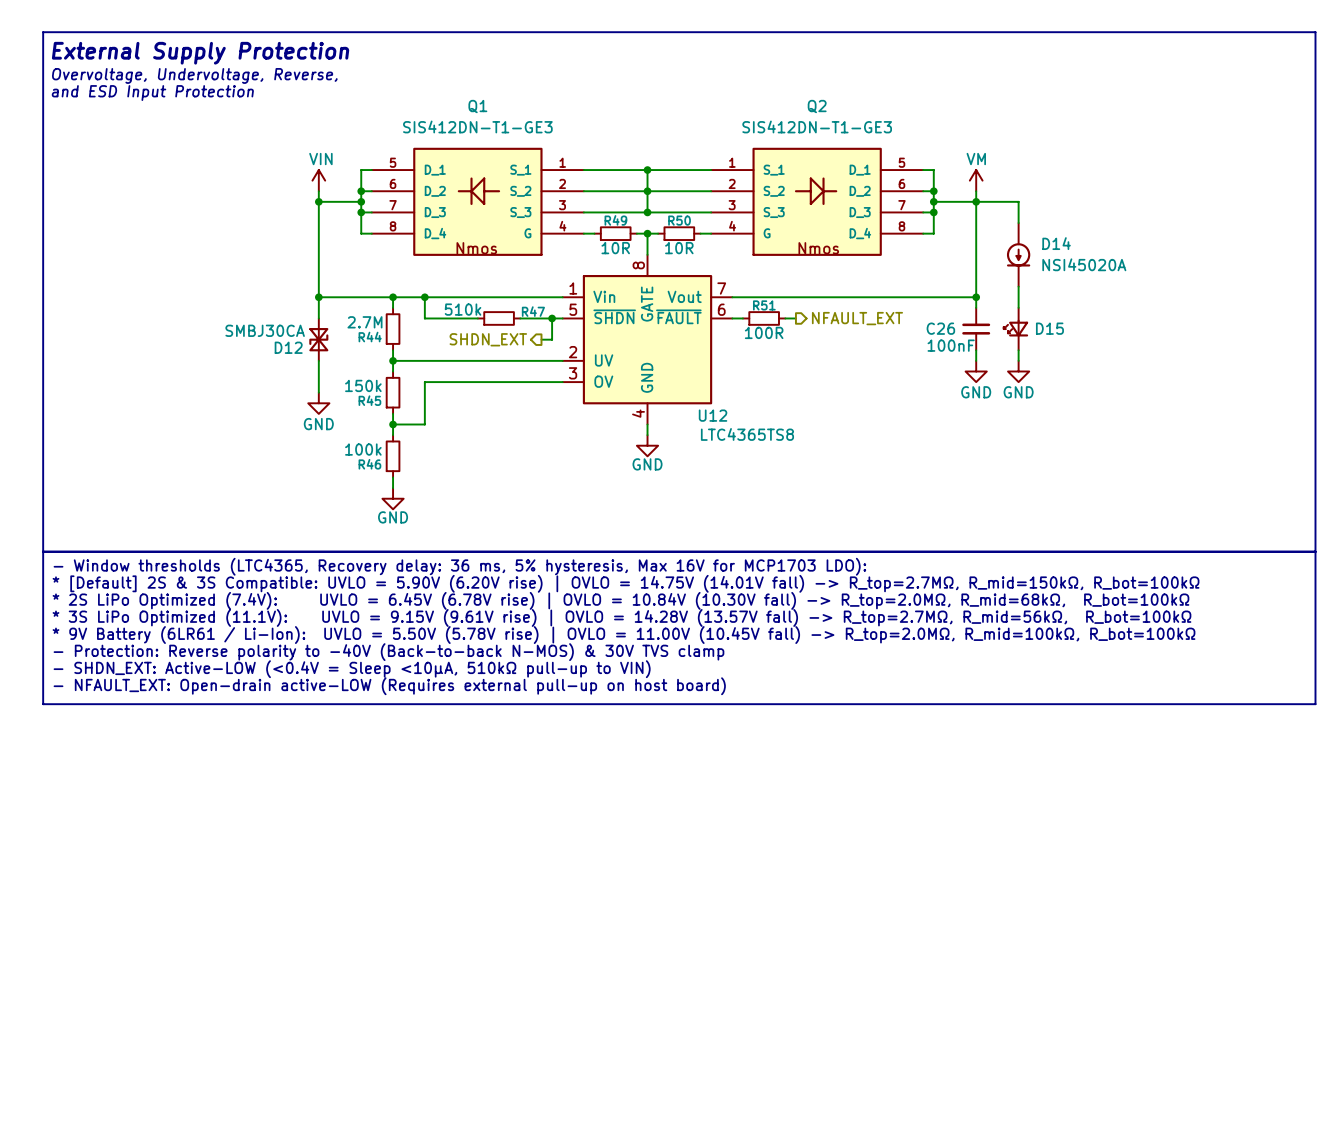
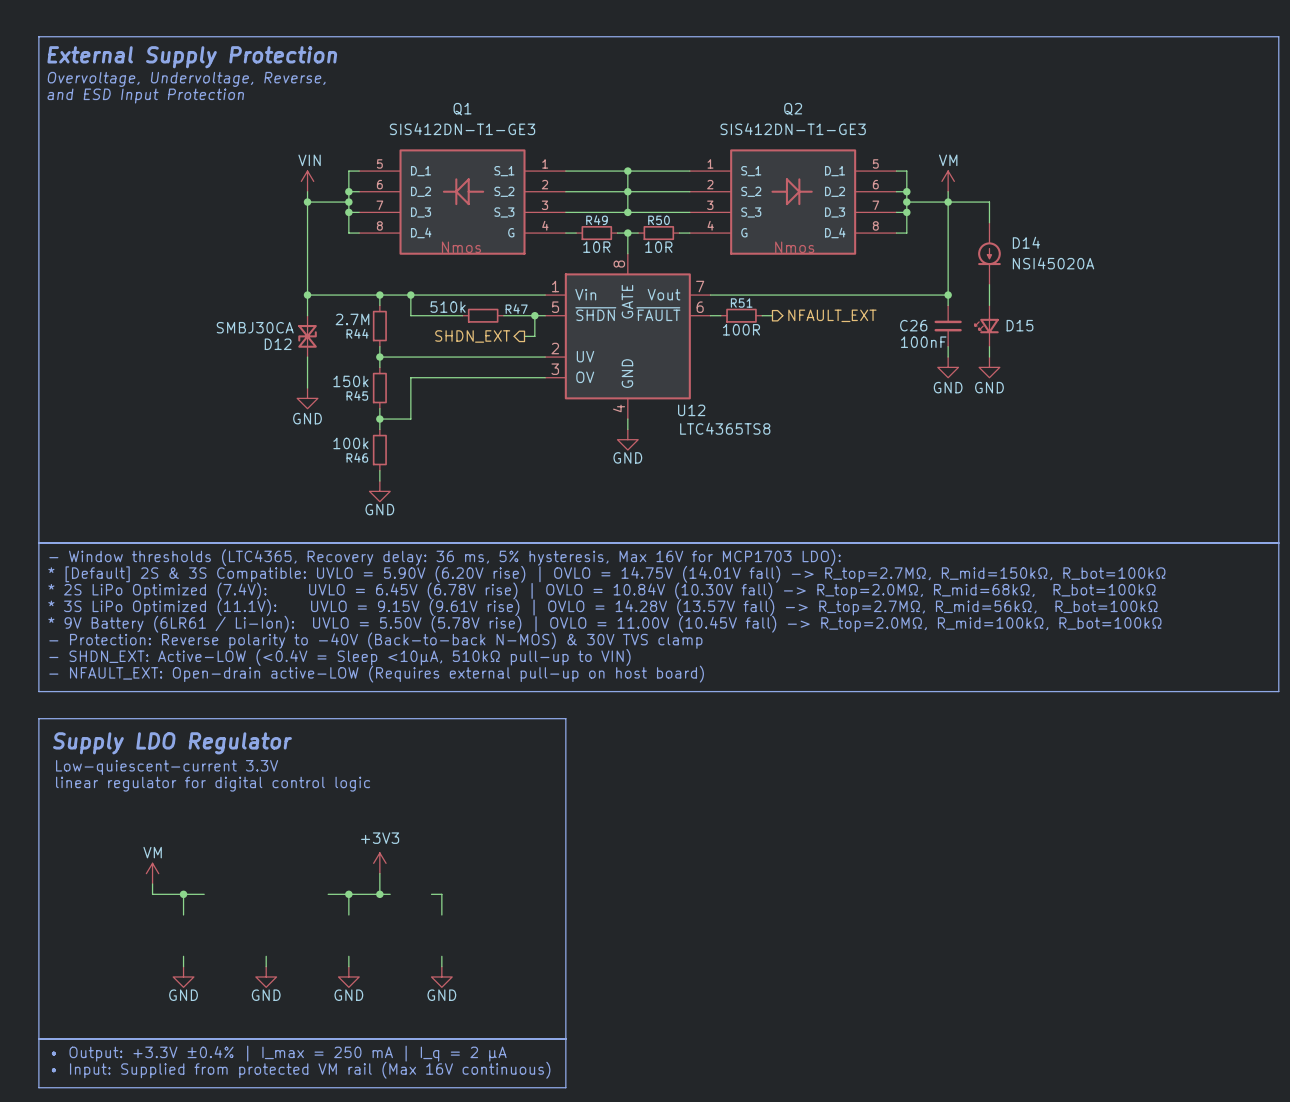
text: none -> Supply LDO Regulator (172, 743)
text: none -> Low-quiescent-current 3.3V (167, 767)
text: none -> linear regulator for digital control logic (213, 784)
power symbol: none -> +3V3 (379, 863)
power symbol: none -> VM (152, 873)
wire: none -> (379, 873) (379, 894)
wire: none -> (152, 883) (152, 894) (204, 894)
wire: none -> (183, 894) (183, 914)
junction: none -> (183, 894)
wire: none -> (328, 894) (390, 894)
wire: none -> (348, 894) (348, 914)
junction: none -> (348, 894)
junction: none -> (379, 894)
wire: none -> (431, 894) (441, 894) (441, 914)
wire: none -> (183, 956) (183, 966)
wire: none -> (266, 956) (266, 966)
wire: none -> (348, 956) (348, 966)
wire: none -> (441, 956) (441, 966)
power symbol: none -> GND (183, 976)
power symbol: none -> GND (266, 976)
power symbol: none -> GND (348, 976)
power symbol: none -> GND (441, 976)
line: none -> (38, 1038) (565, 1038)
line: none -> (38, 1038) (38, 718) (565, 718) (565, 1038)
line: none -> (38, 1038) (38, 1087) (565, 1087) (565, 1038)
line: none -> (38, 1038) (565, 1038)
text: none -> • Output: +3.3V ±0.4% | I_max = 250 mA | I_q = 2 µA (279, 1053)
text: none -> • Input: Supplied from protected VM rail (Max 16V continuous) (301, 1070)

